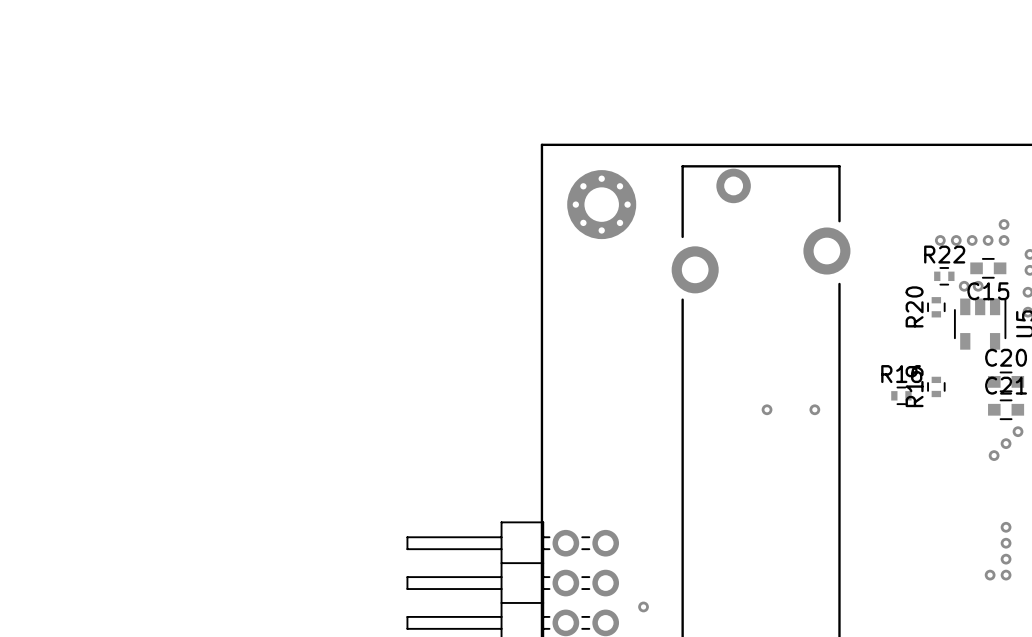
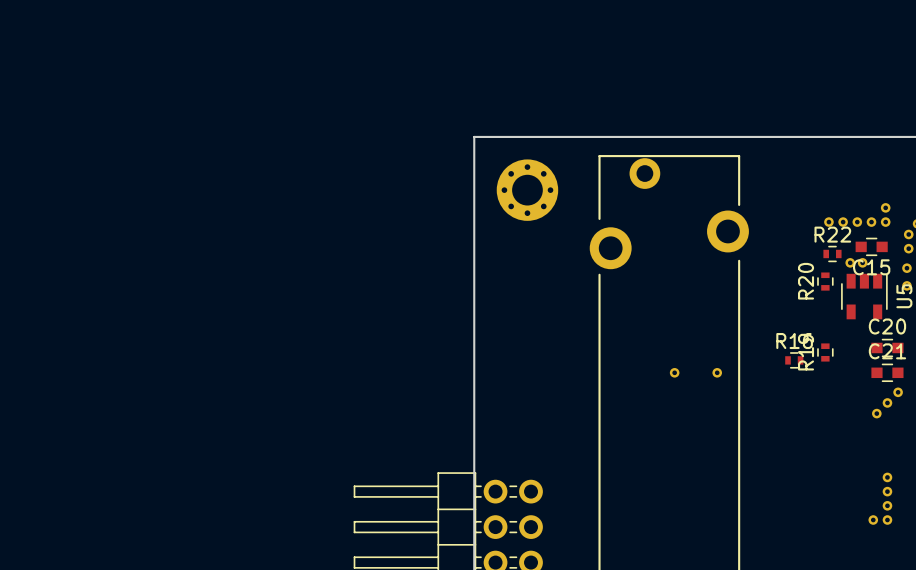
part: (643, 606) -> none

